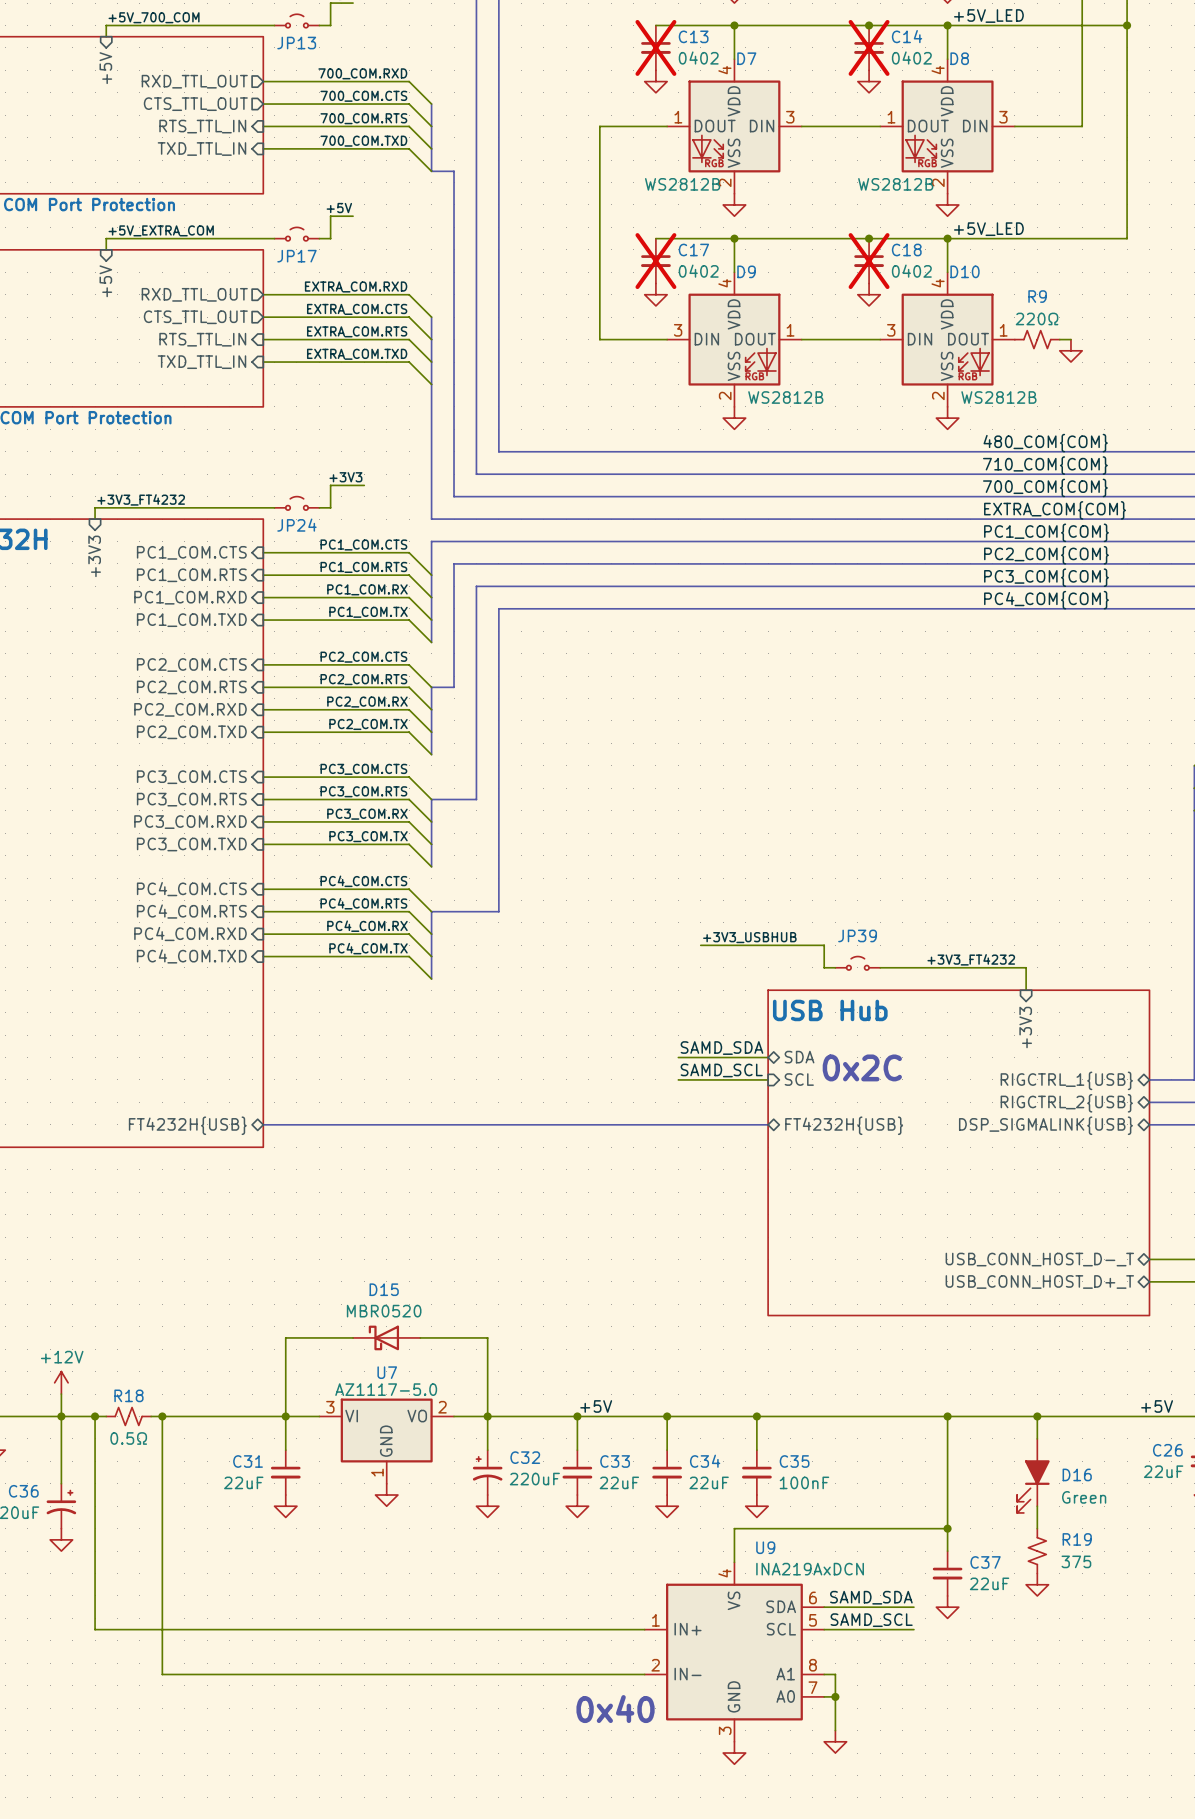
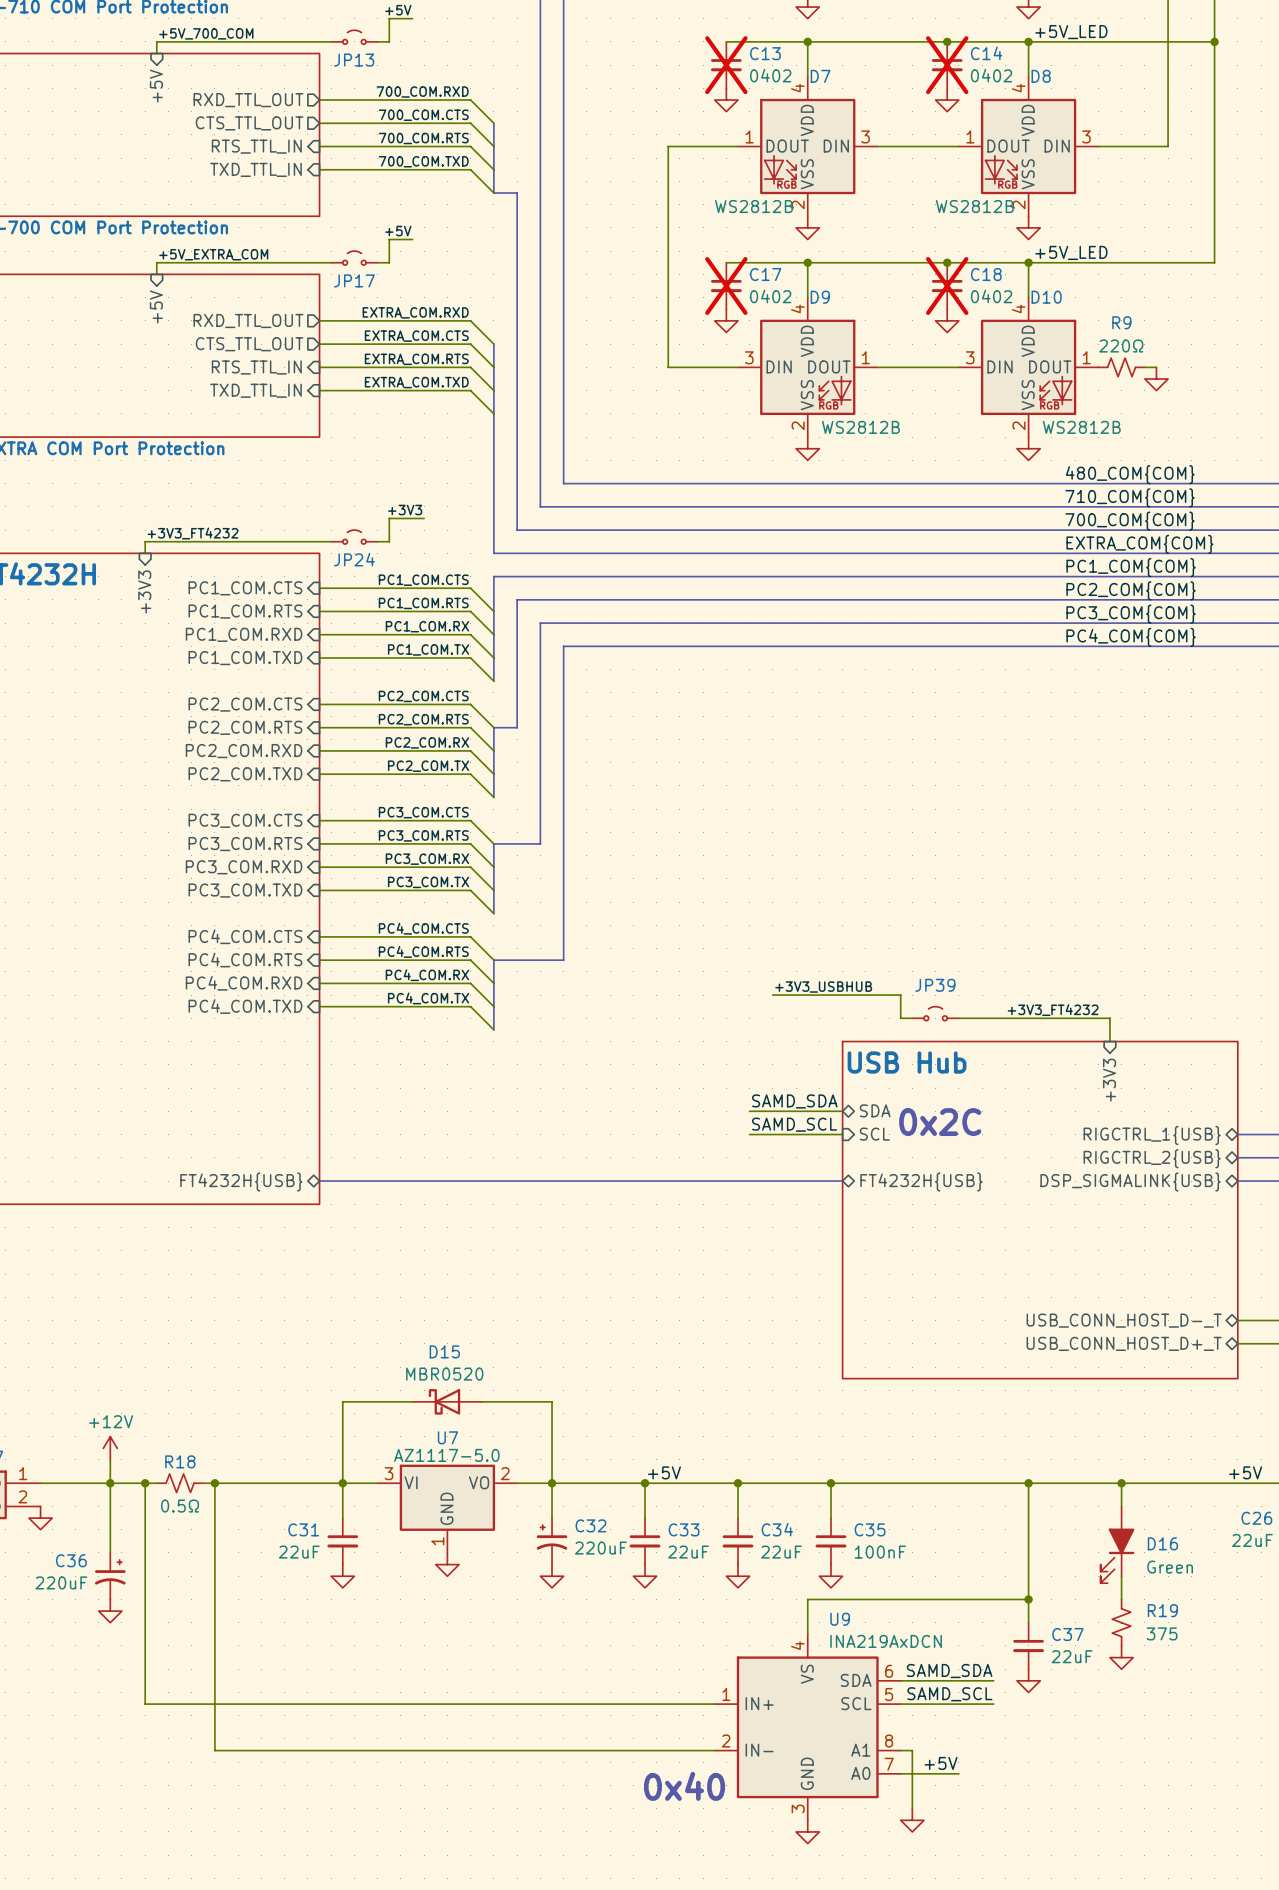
label: none -> +5V (941, 1763)
wire: none -> (912, 1773) (958, 1773)
junction: (835, 1696) -> none

